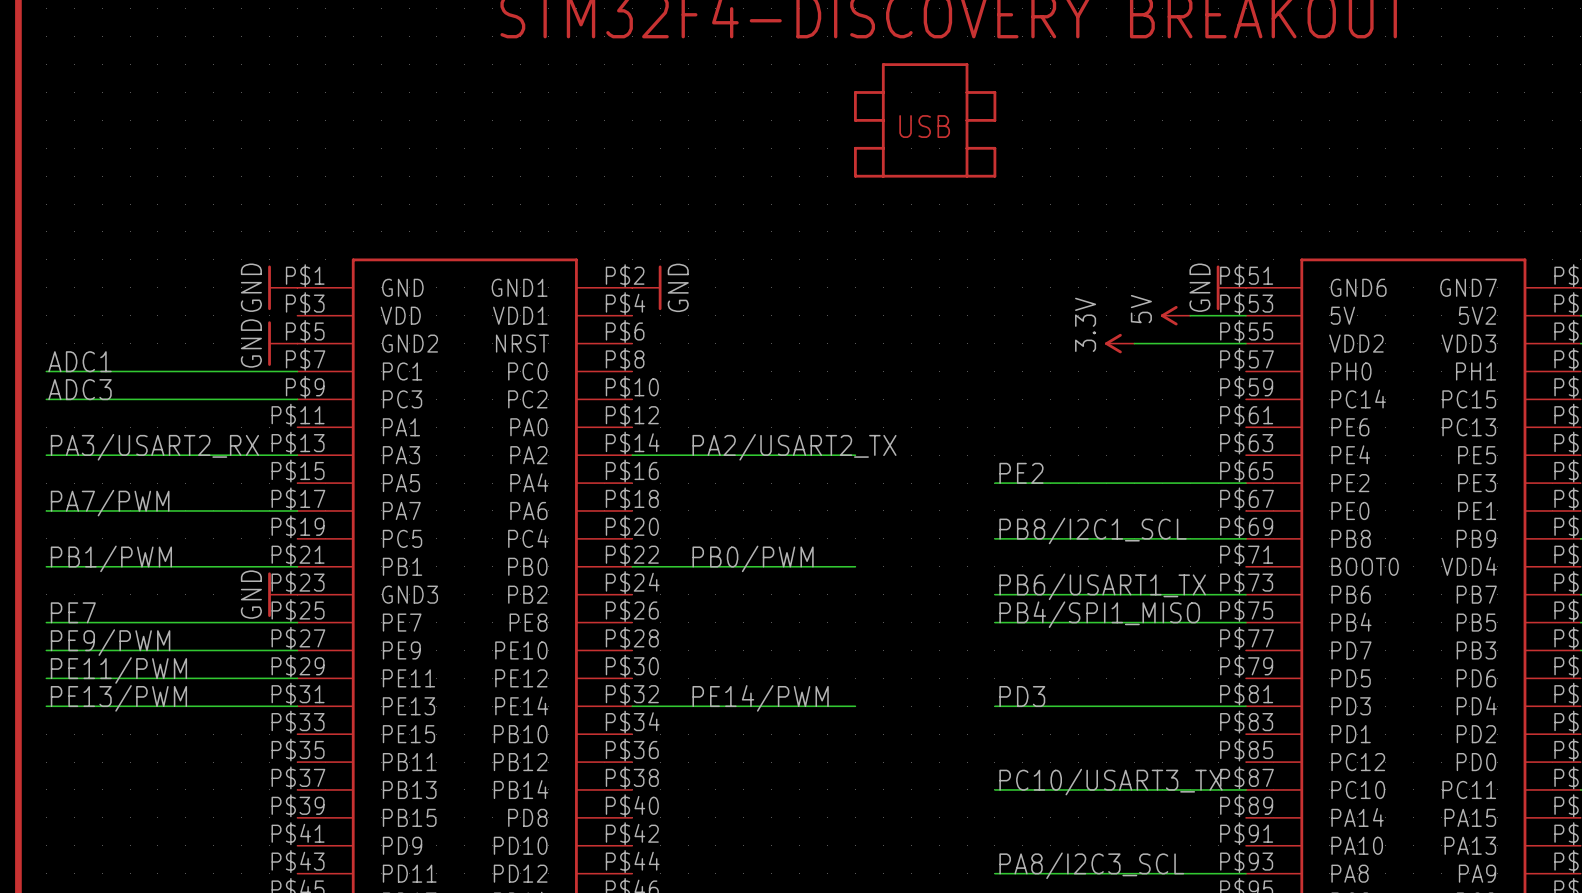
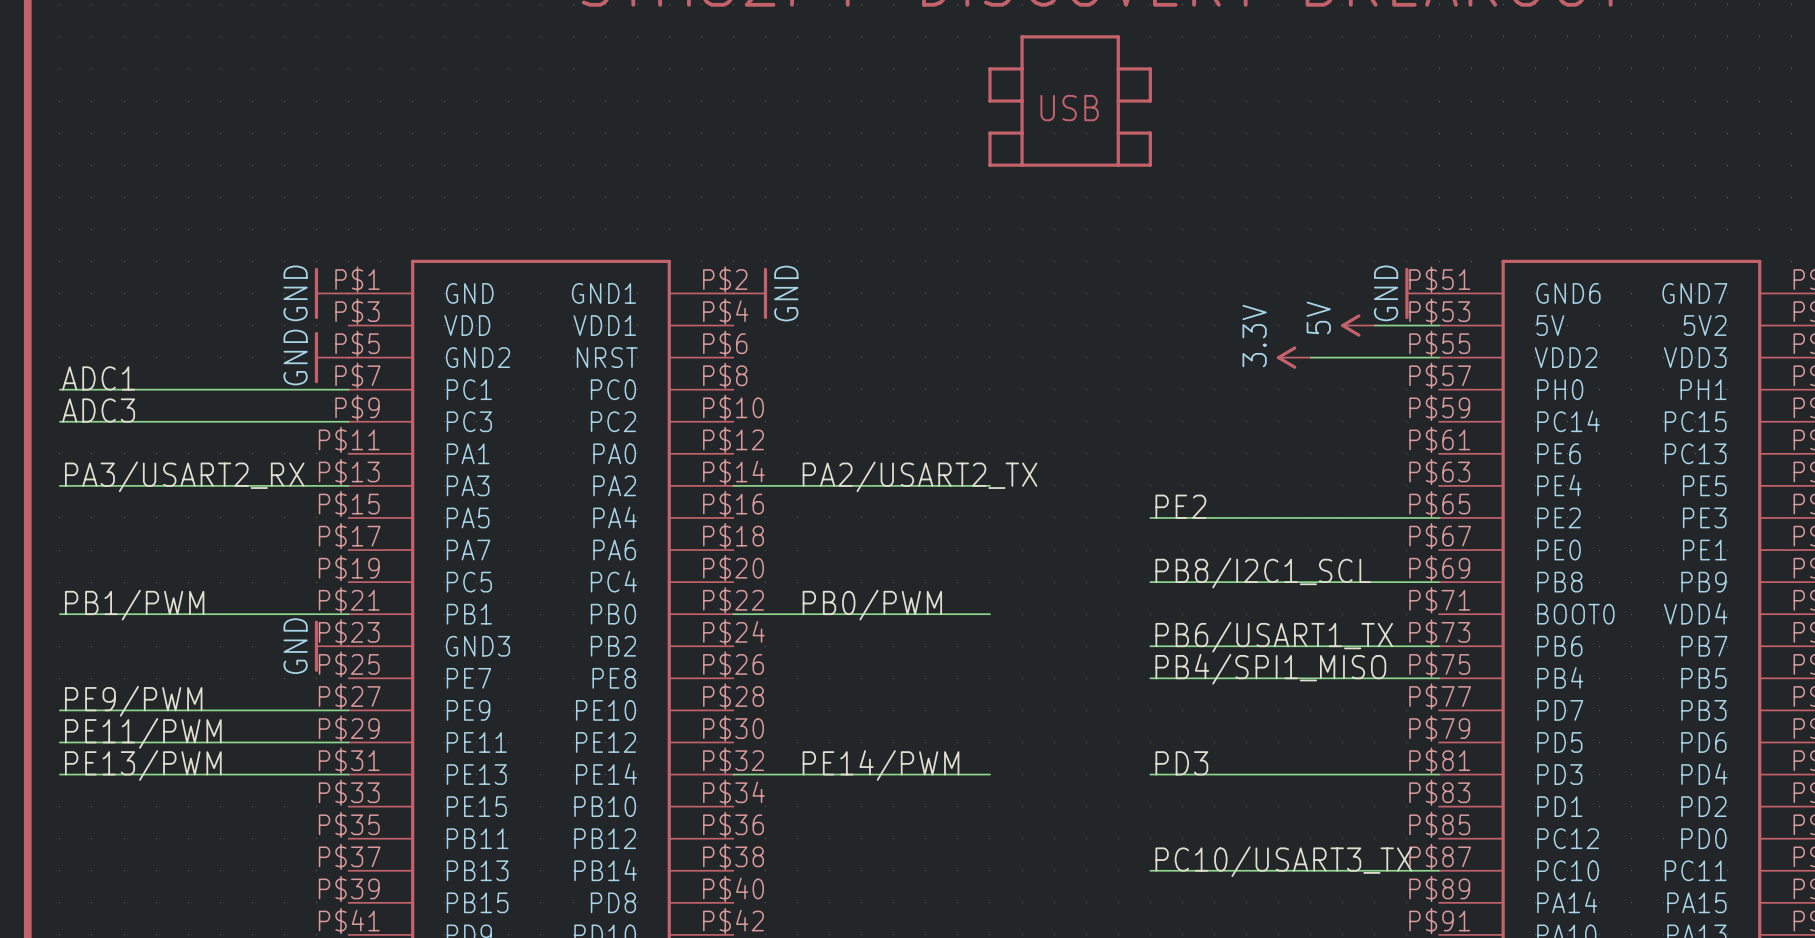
label: PA7/PWM (110, 503) -> none
wire: (46, 510) (297, 510) -> none
label: PE7 (73, 612) -> none
wire: (46, 622) (297, 622) -> none

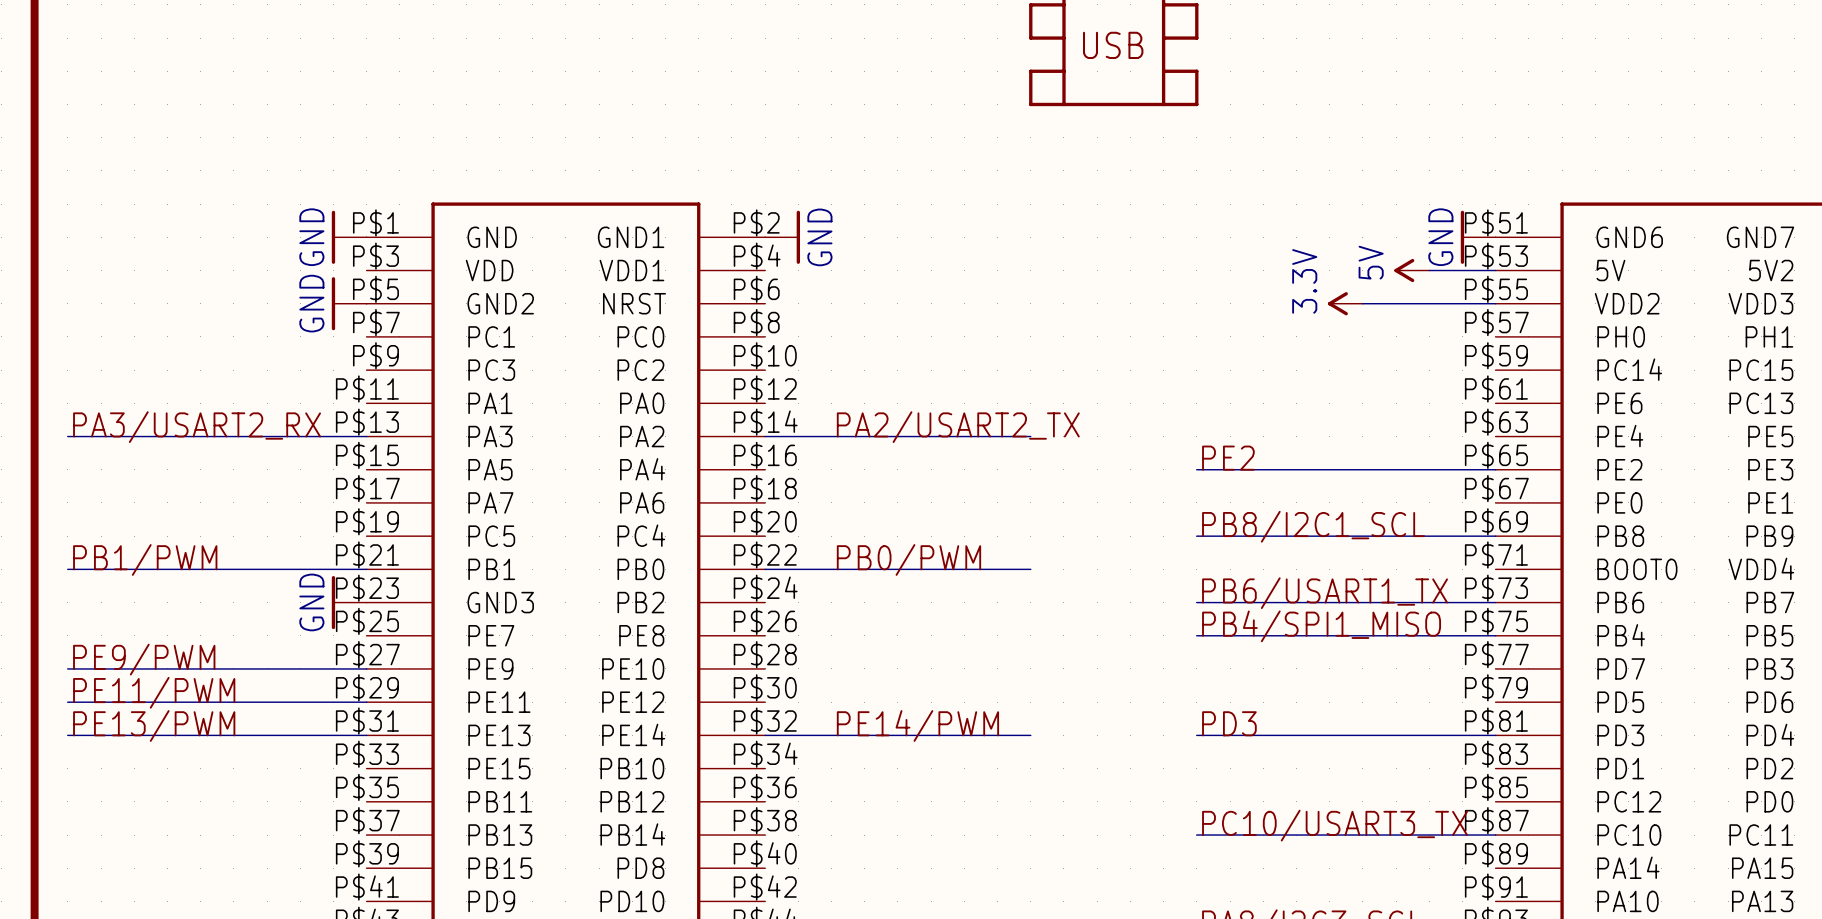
label: ADC1 (98, 378) -> none
wire: (59, 389) (348, 389) -> none
label: ADC3 (98, 410) -> none
wire: (59, 421) (348, 421) -> none

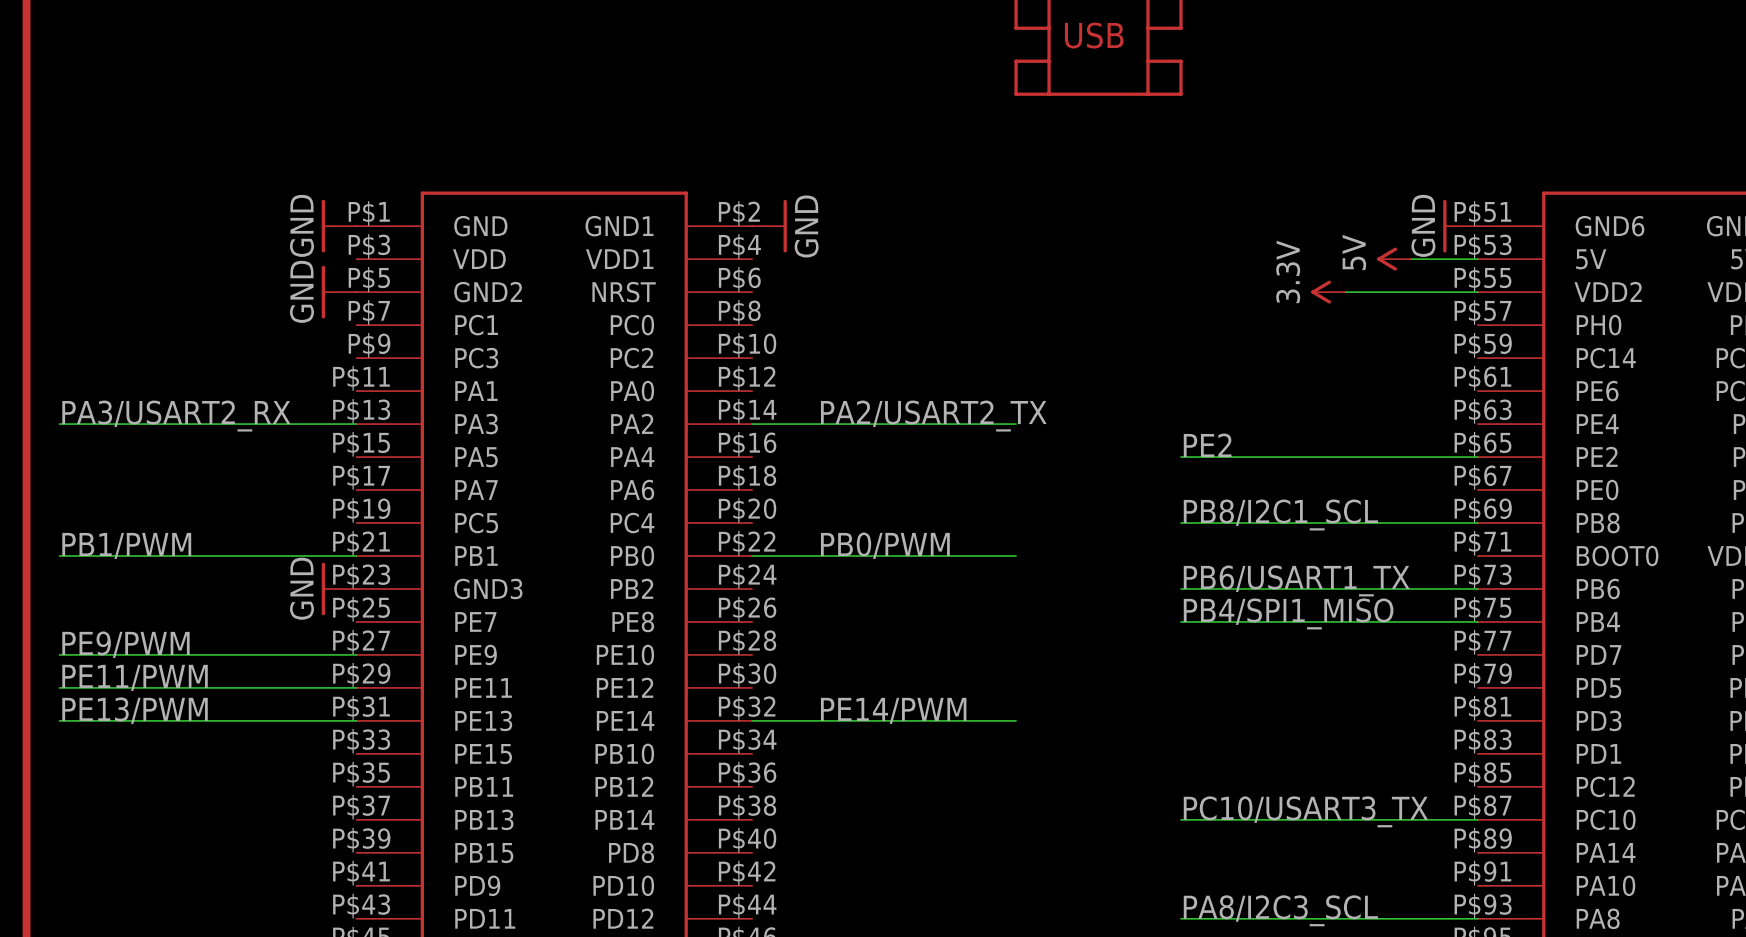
label: PD3 (1229, 723) -> none
wire: (1196, 735) (1495, 735) -> none

